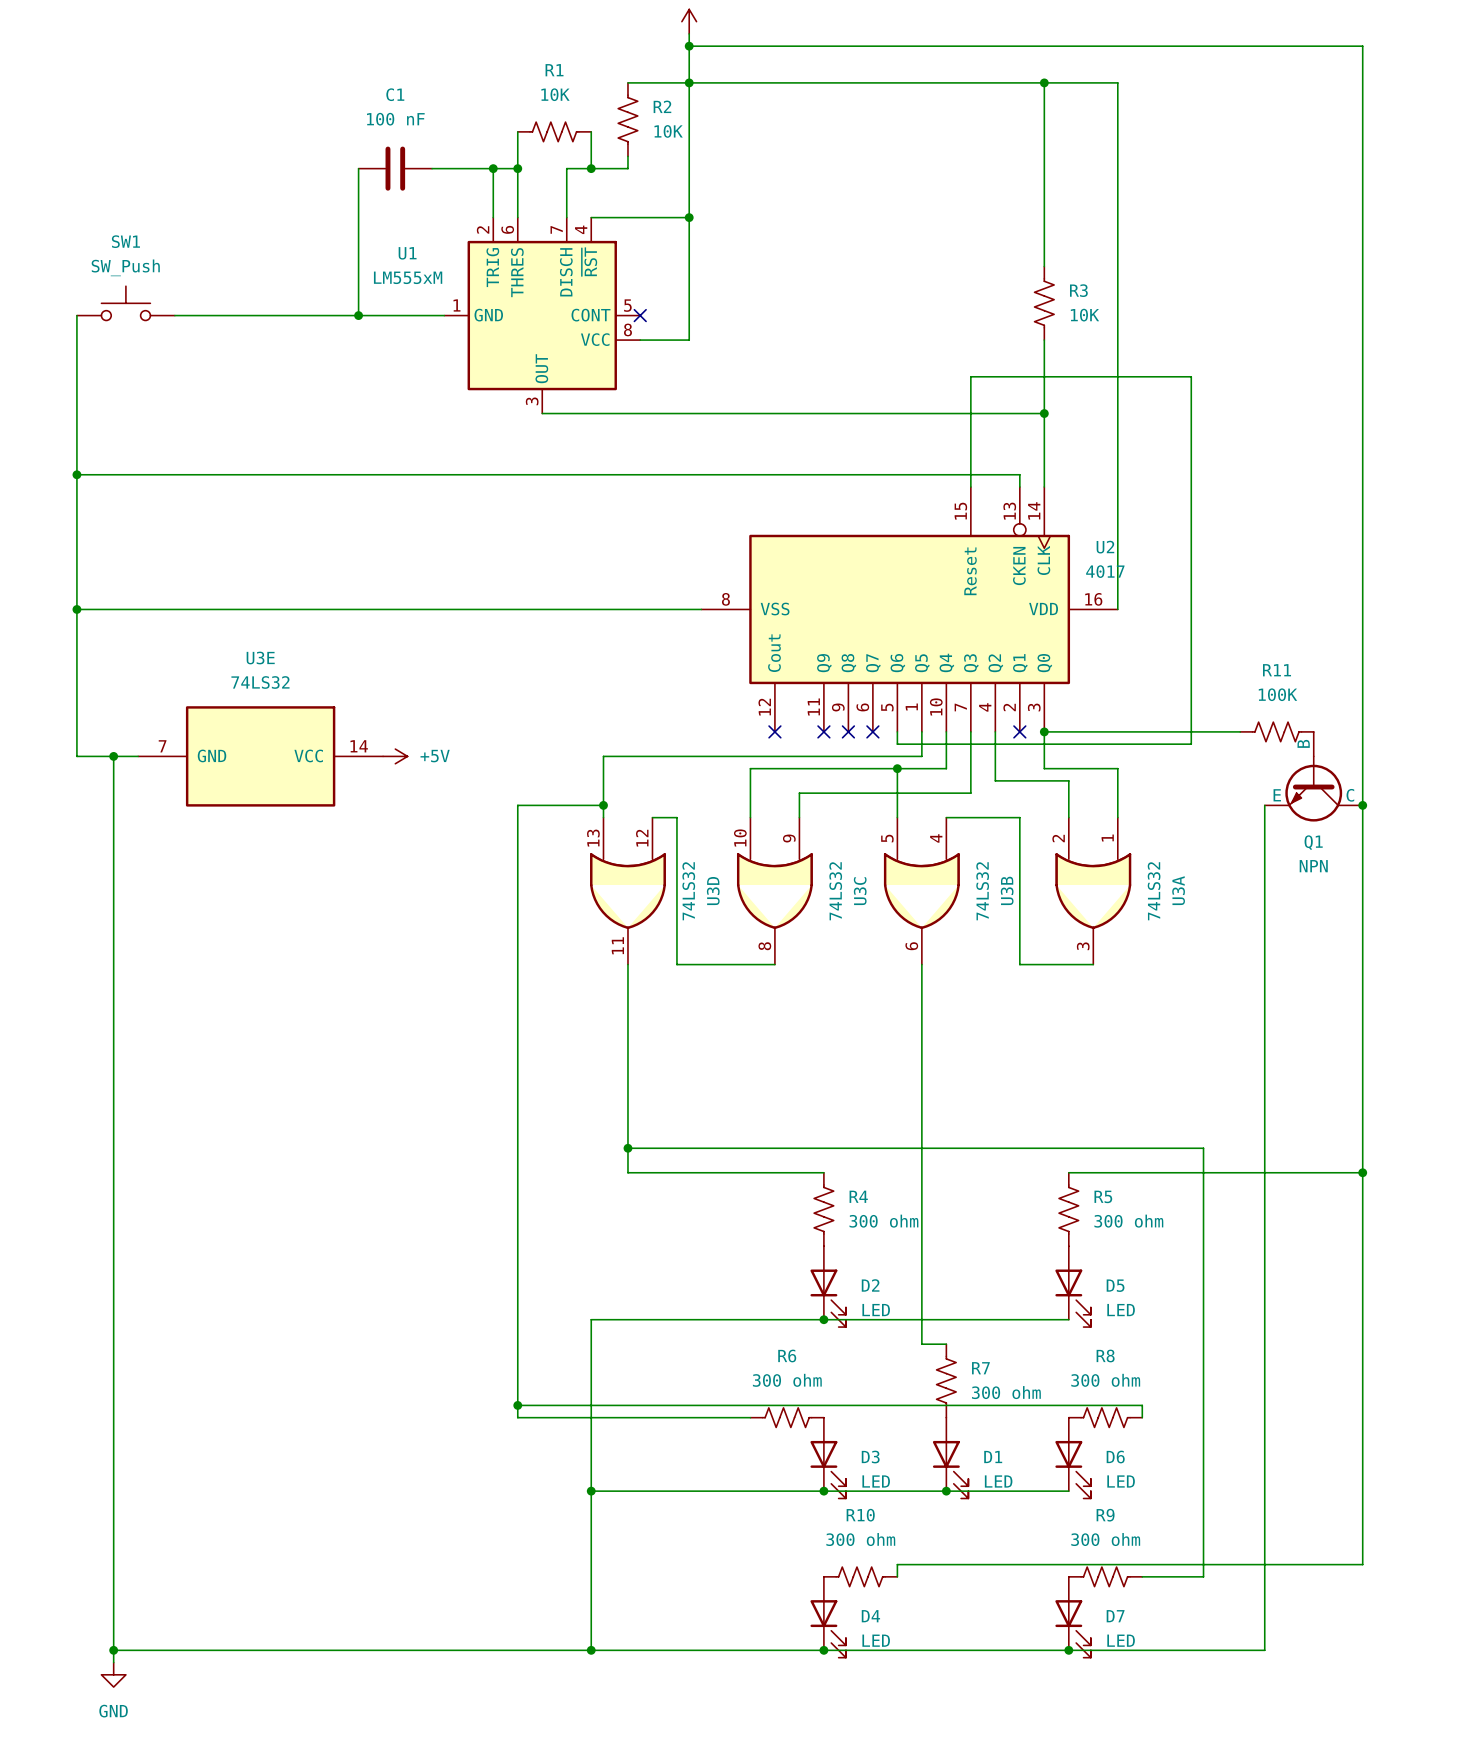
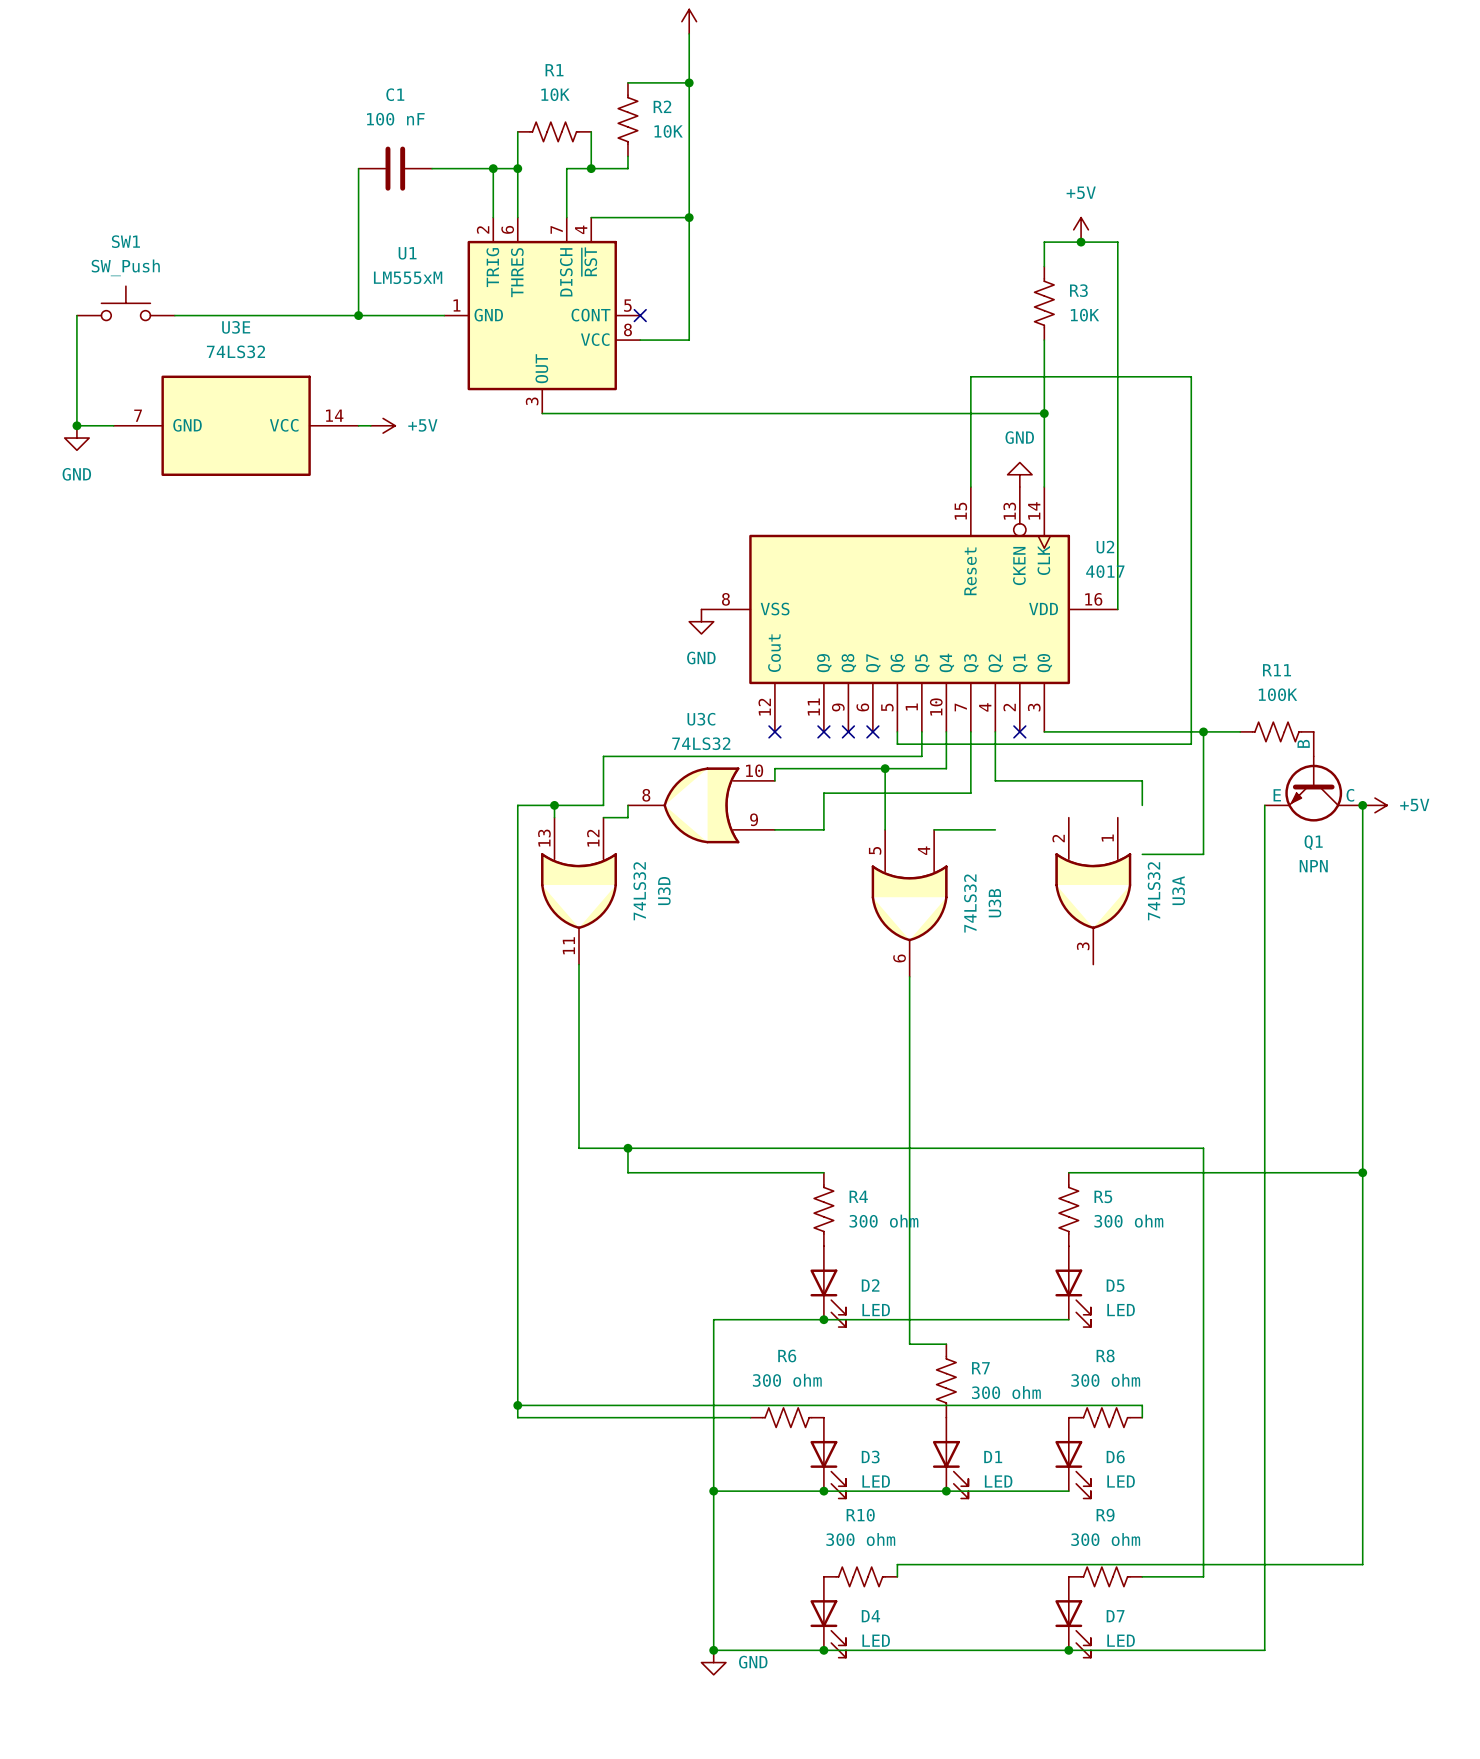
wire: (689, 46) (1362, 46) (1362, 805) -> none
junction: (689, 46) -> none
wire: (689, 82) (1117, 82) (1117, 242) -> none
wire: (1044, 82) (1044, 242) -> (1117, 242) (1044, 242)
junction: (1044, 82) -> none
power symbol: none -> +5V (1081, 229)
junction: none -> (1081, 242)
wire: (76, 425) (76, 756) (138, 756) -> (76, 425) (113, 425)
wire: none -> (358, 425) (370, 425)
power symbol: none -> +5V (383, 425)
power symbol: none -> GND (76, 438)
wire: (76, 474) (1019, 474) (1019, 487) -> none
junction position: (76, 474) -> (76, 425)
power symbol: none -> GND (1019, 474)
wire: (76, 609) (701, 609) -> none
junction: (76, 609) -> none
power symbol: none -> GND (701, 621)
wire: (1044, 731) (1044, 768) (1117, 768) (1117, 817) -> none
junction: (1044, 731) -> none
wire: none -> (1203, 731) (1203, 854) (1142, 854)
junction: none -> (1203, 731)
wire: (113, 756) (113, 1662) -> none
junction: (113, 756) -> none
U3E position: (260, 756) -> (236, 425)
power symbol: +5V (395, 756) -> none
wire: (774, 768) (750, 768) (750, 817) -> (774, 768) (774, 780)
wire: none -> (885, 768) (885, 829)
wire: (897, 768) (897, 817) -> none
junction position: (897, 768) -> (885, 768)
wire: (1068, 780) (1068, 817) -> (1068, 780) (1142, 780) (1142, 805)
wire: (823, 793) (799, 793) (799, 817) -> (823, 793) (823, 829) (774, 829)
wire: none -> (554, 805) (554, 817)
wire: (603, 805) (603, 817) -> (627, 805) (627, 817) (603, 817)
junction position: (603, 805) -> (554, 805)
power symbol: none -> +5V (1374, 805)
wire: (652, 817) (676, 817) (676, 964) (774, 964) -> none
wire: (946, 817) (1019, 817) (1019, 964) (1093, 964) -> none
wire: none -> (934, 829) (995, 829)
U3D position: (627, 891) -> (579, 891)
U3C rotation: 0° (774, 891) -> 90° clockwise (701, 805)
U3C position: (774, 891) -> (701, 805)
U3C value position: 74LS32 (835, 891) -> 74LS32 (701, 743)
U3C name position: U3C (860, 891) -> U3C (701, 719)
U3B position: (921, 891) -> (909, 903)
wire: (627, 964) (627, 1148) -> (579, 964) (579, 1148) (627, 1148)
wire: (921, 964) (921, 1344) -> (909, 976) (909, 1344) (921, 1344)
wire: (713, 1319) (591, 1319) (591, 1650) -> (713, 1319) (713, 1650)
wire: (591, 1491) (713, 1491) -> none
junction: (591, 1491) -> none
junction: none -> (713, 1491)
wire: (113, 1650) (713, 1650) -> none
junction: (113, 1650) -> none
junction: (591, 1650) -> none
junction: none -> (713, 1650)
power symbol: none -> GND (713, 1662)
power symbol: GND (113, 1674) -> none

